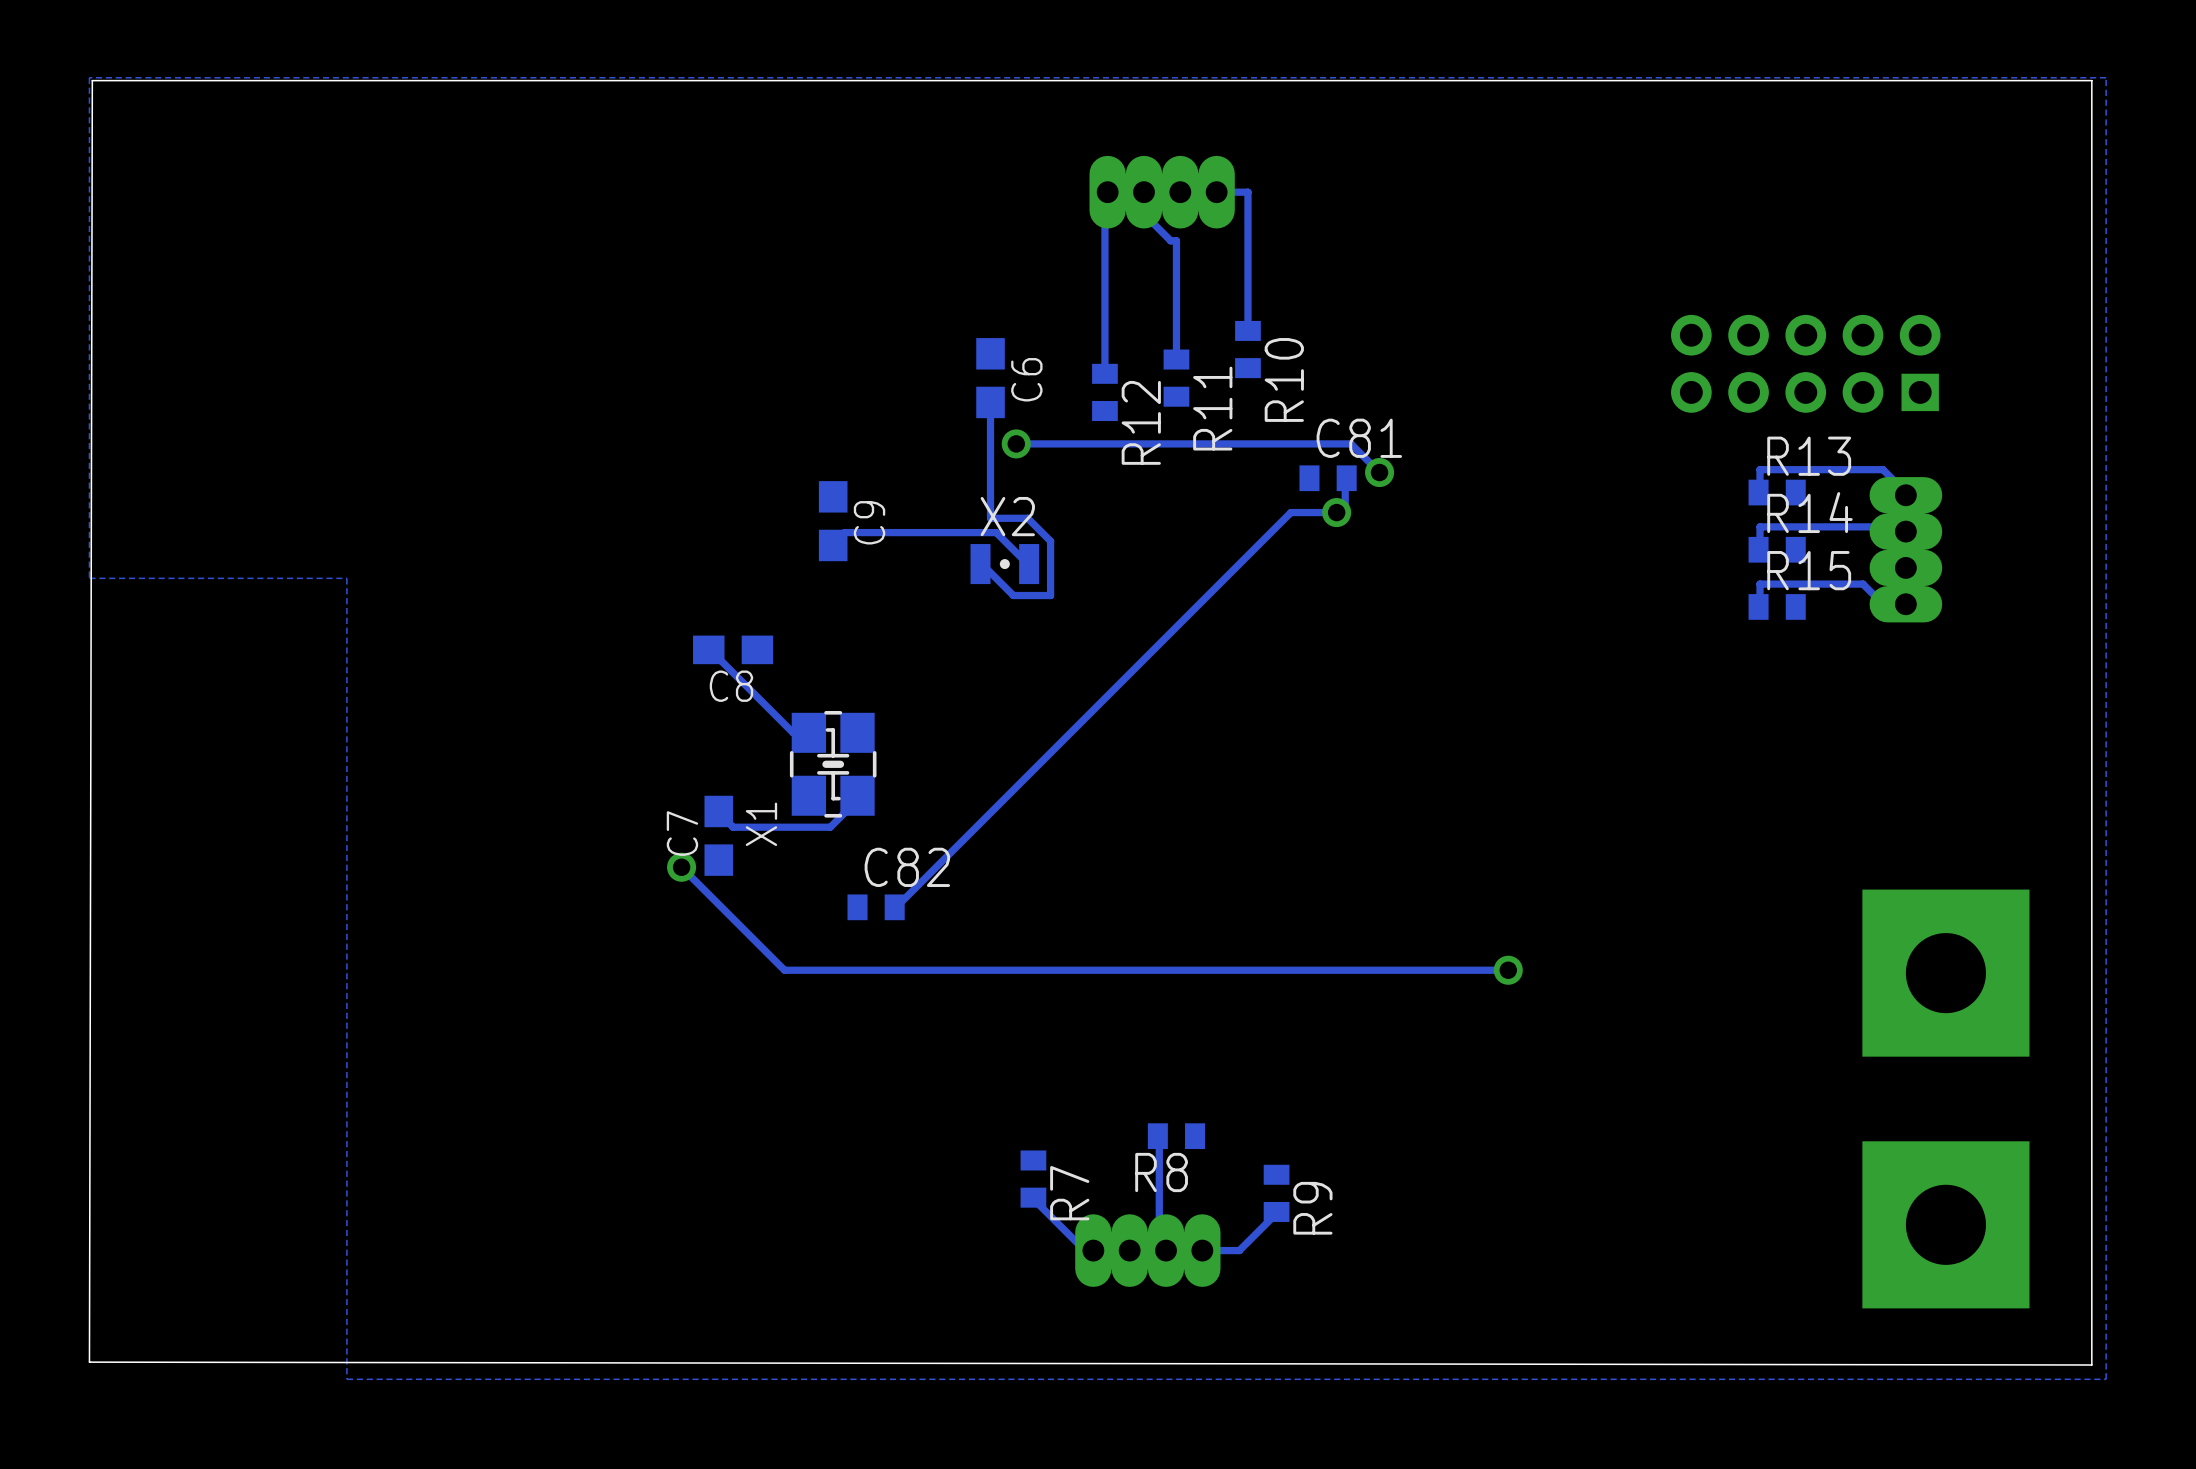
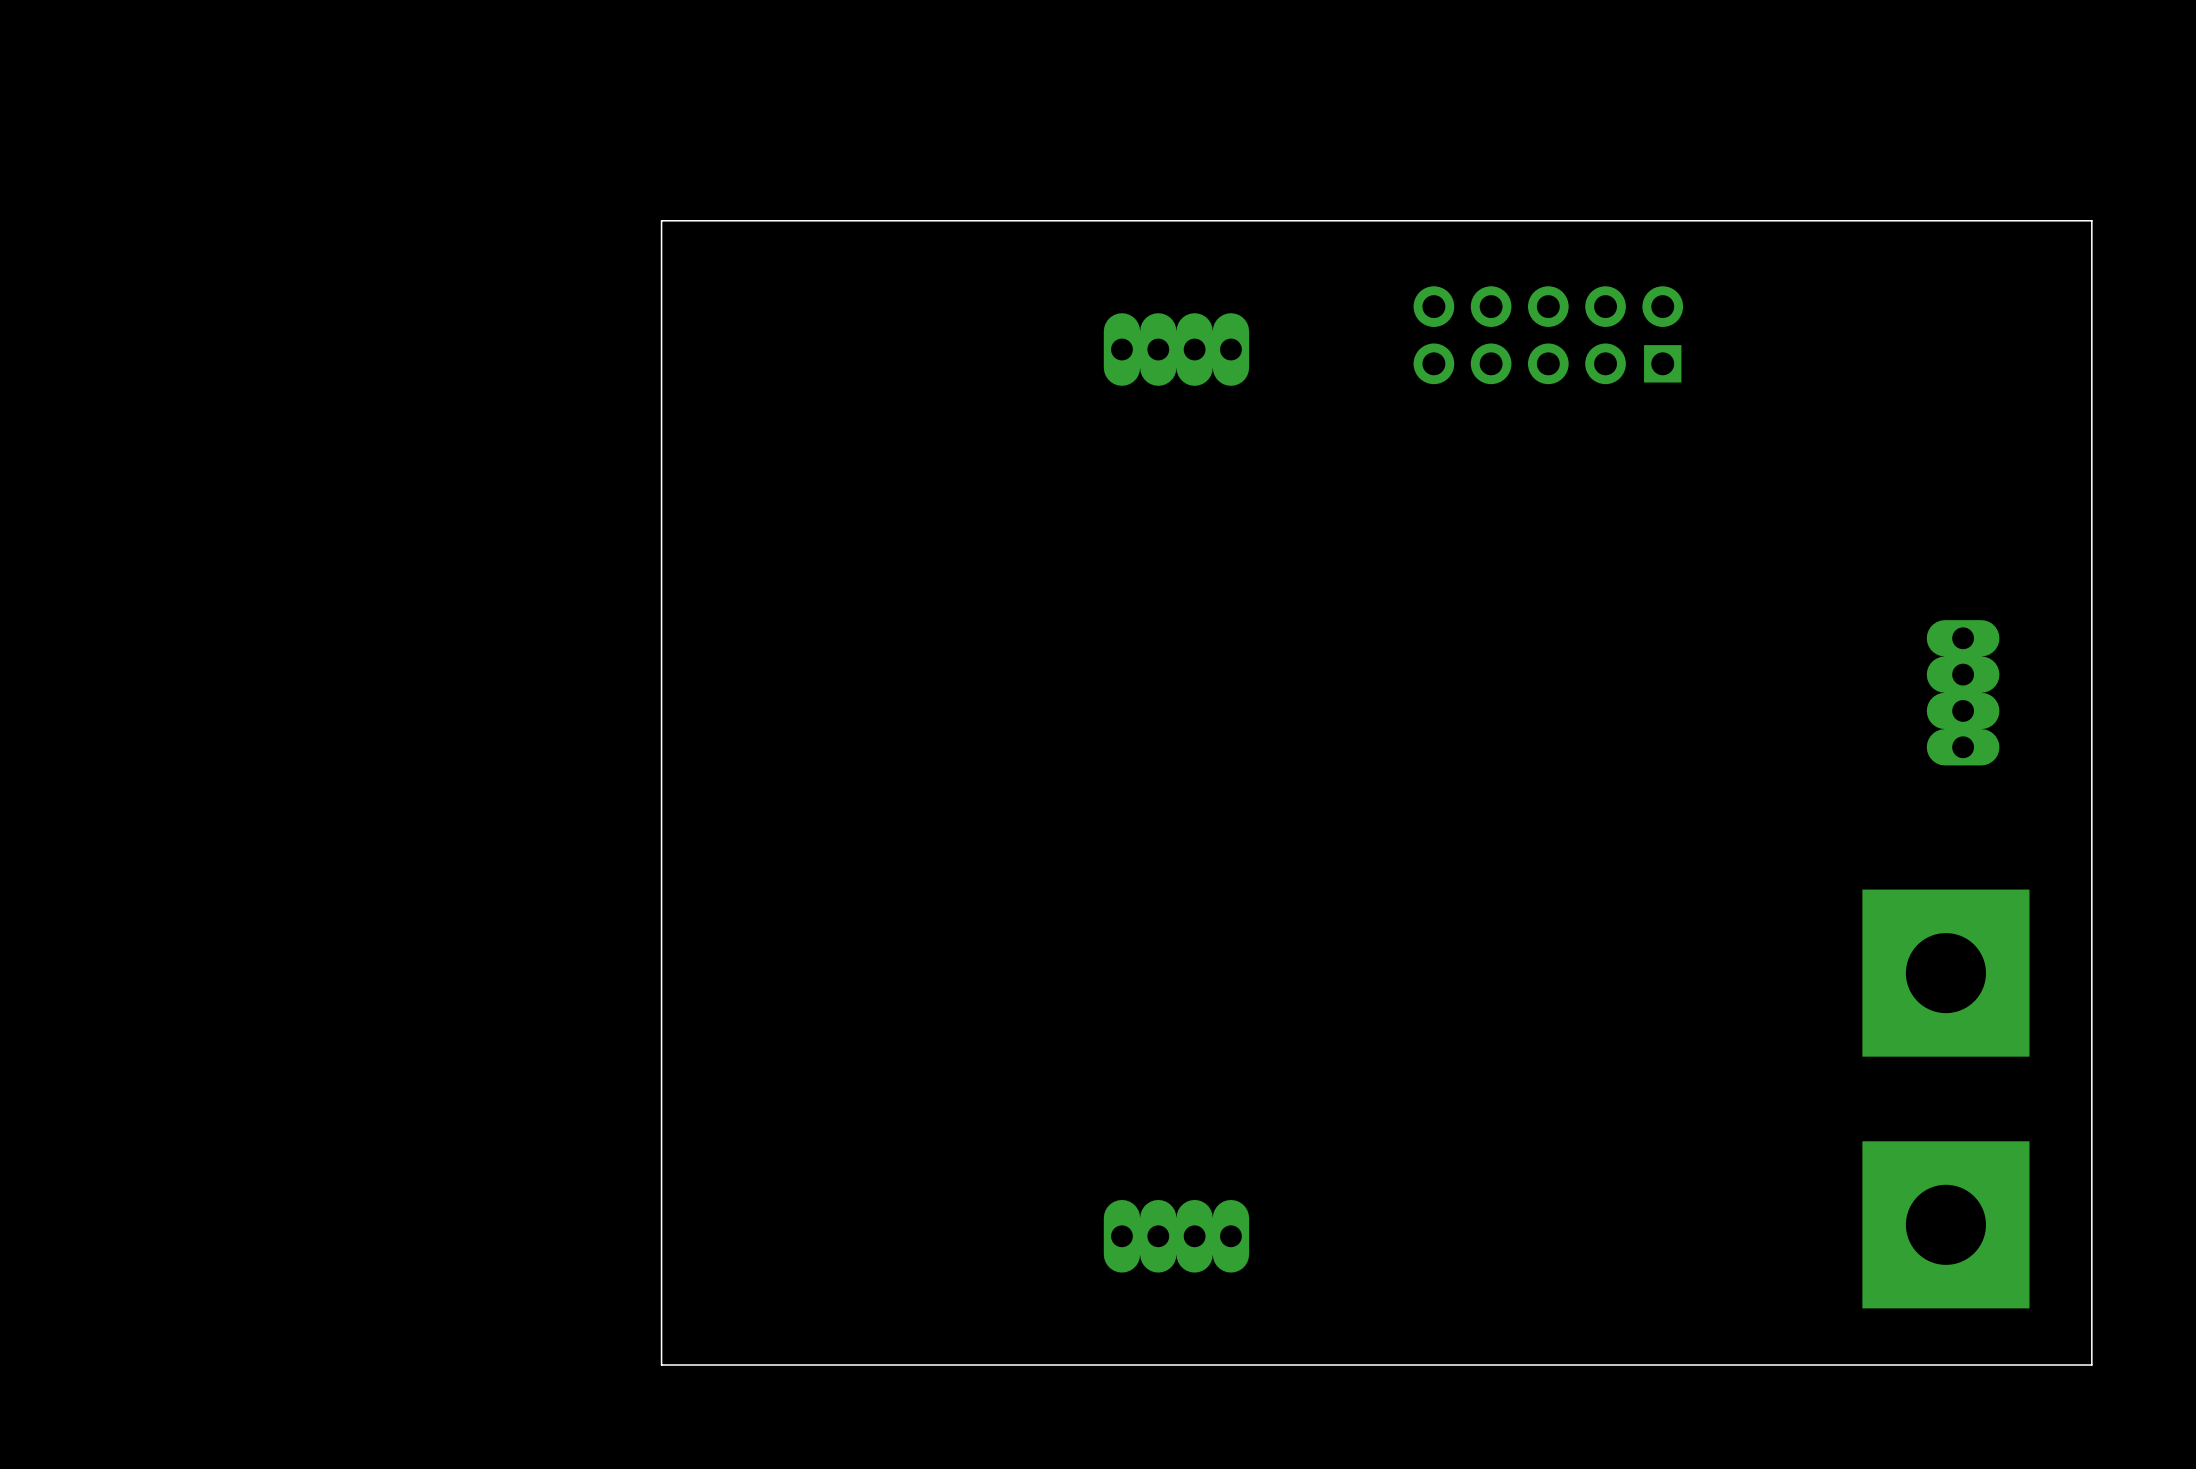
zone outline: (2106, 77) (89, 77) (89, 578) (346, 578) (346, 1379) (2106, 1379) (2106, 77) -> none
track: (1107, 192) (1104, 192) (1104, 373) -> none
track: (1143, 192) (1144, 215) (1170, 240) (1176, 240) (1176, 359) -> none
part position: (1162, 192) -> (1176, 349)
track: (1216, 192) (1247, 192) (1247, 330) -> none
board edge: (2091, 220) (2091, 80) (92, 80) (89, 1362) (2091, 1365) -> (2091, 220) (661, 220) (661, 1365) (2091, 1365)
R10: (1247, 349) -> none
part position: (1805, 363) -> (1548, 335)
C6: (990, 378) -> none
R11: (1176, 378) -> none
R12: (1104, 392) -> none
track: (990, 402) (990, 518) (1027, 518) (1050, 541) (1050, 595) (1013, 595) (980, 564) -> none
track: (1016, 443) (1350, 443) (1379, 472) -> none
via: (1016, 443) -> none
via: (1379, 472) -> none
C81: (1328, 478) -> none
track: (1346, 478) (1345, 512) (1290, 512) (894, 907) -> none
track: (1758, 492) (1760, 469) (1883, 469) (1905, 492) (1905, 495) -> none
R13: (1777, 492) -> none
via: (1336, 512) -> none
C9: (833, 521) -> none
track: (1905, 531) (1903, 526) (1760, 526) (1758, 549) -> none
track: (833, 545) (844, 532) (996, 532) (1029, 564) -> none
R14: (1777, 549) -> none
part position: (1905, 549) -> (1963, 692)
X2: (1004, 564) -> none
track: (1905, 604) (1883, 604) (1862, 584) (1760, 584) (1758, 606) -> none
R15: (1777, 606) -> none
track: (708, 649) (793, 732) (808, 732) -> none
C8: (733, 649) -> none
X1: (833, 764) -> none
track: (857, 795) (856, 801) (830, 827) (733, 827) (718, 811) -> none
C7: (718, 835) -> none
track: (681, 867) (784, 970) (1508, 970) -> none
via: (681, 867) -> none
C82: (876, 907) -> none
via: (1508, 970) -> none
track: (1157, 1136) (1159, 1250) (1166, 1250) -> none
R8: (1176, 1136) -> none
R7: (1033, 1179) -> none
R9: (1276, 1193) -> none
track: (1033, 1197) (1084, 1250) (1093, 1250) -> none
track: (1276, 1211) (1239, 1250) (1202, 1250) -> none
part position: (1147, 1250) -> (1176, 1236)

